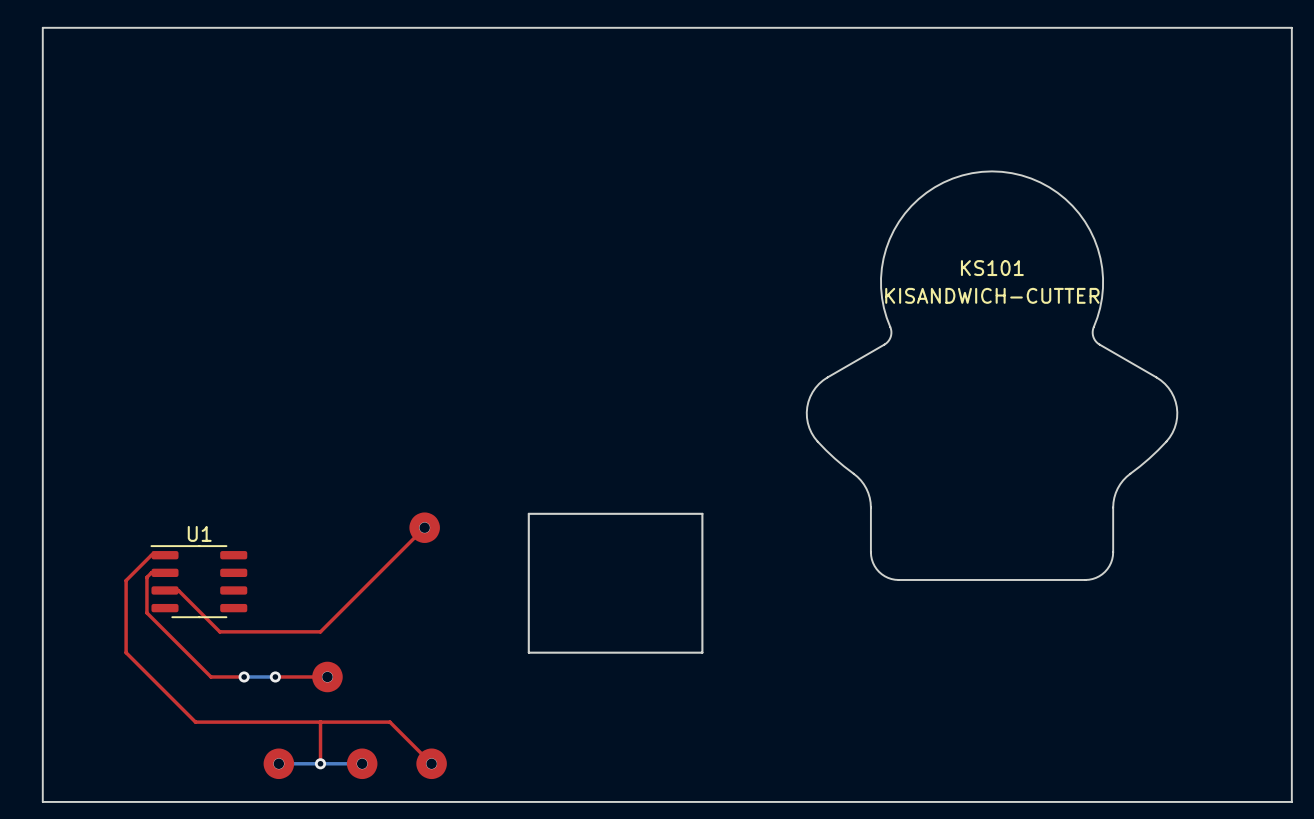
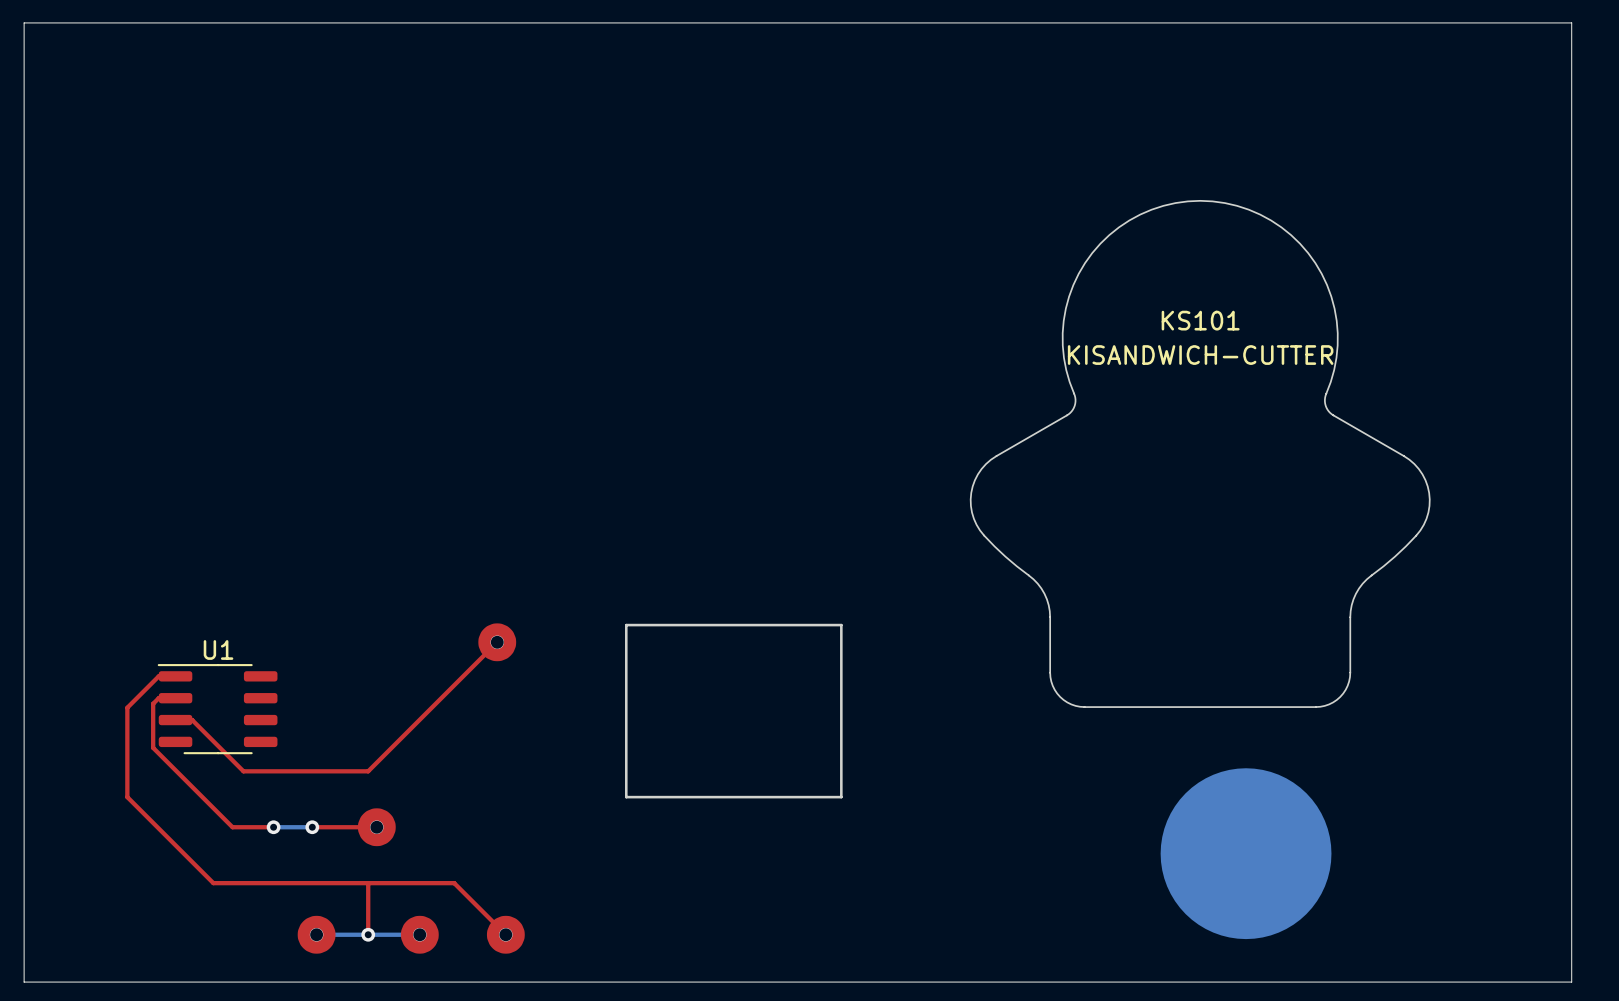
drawing: none -> [1160, 768, 1332, 940]

